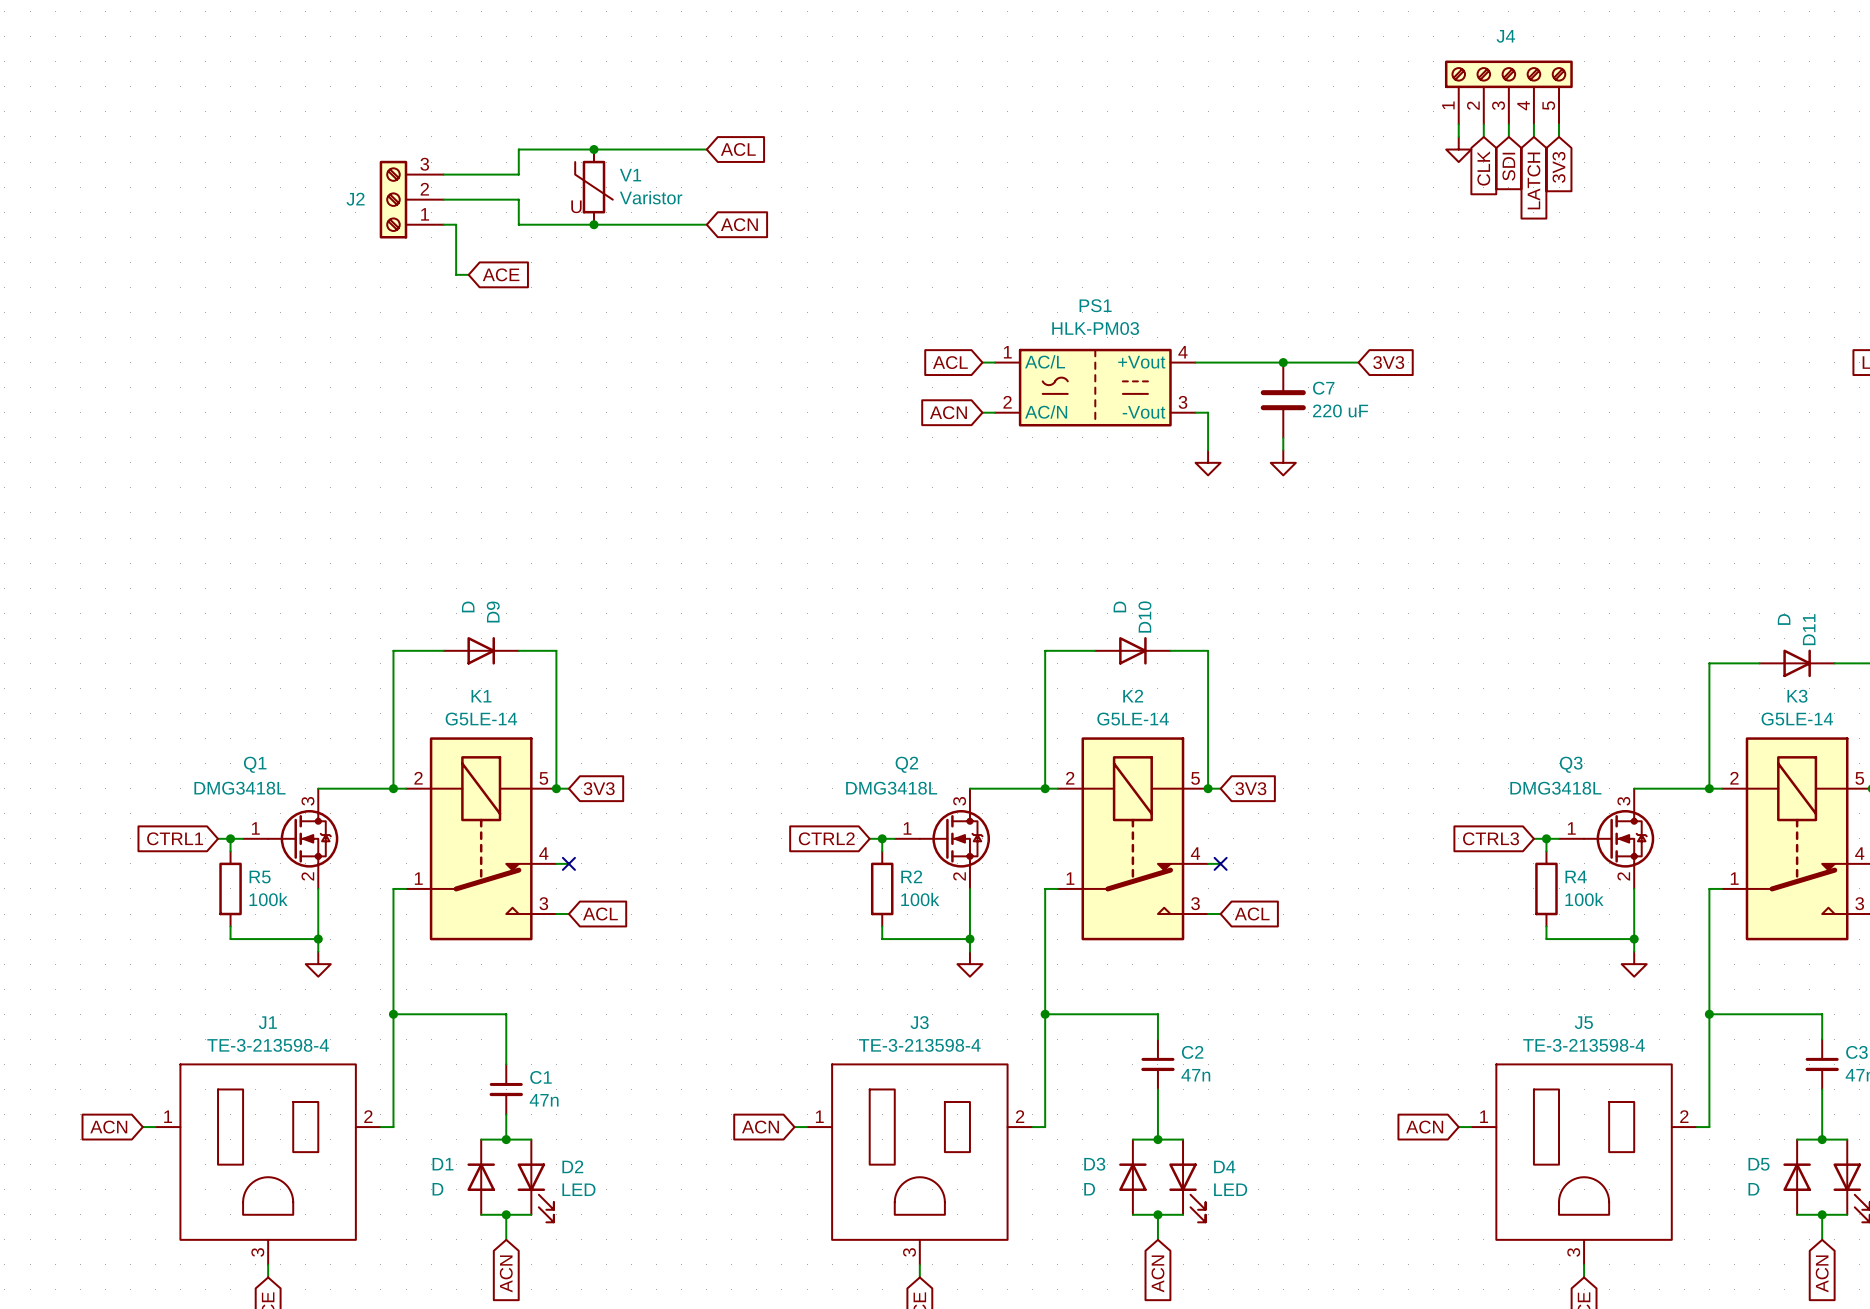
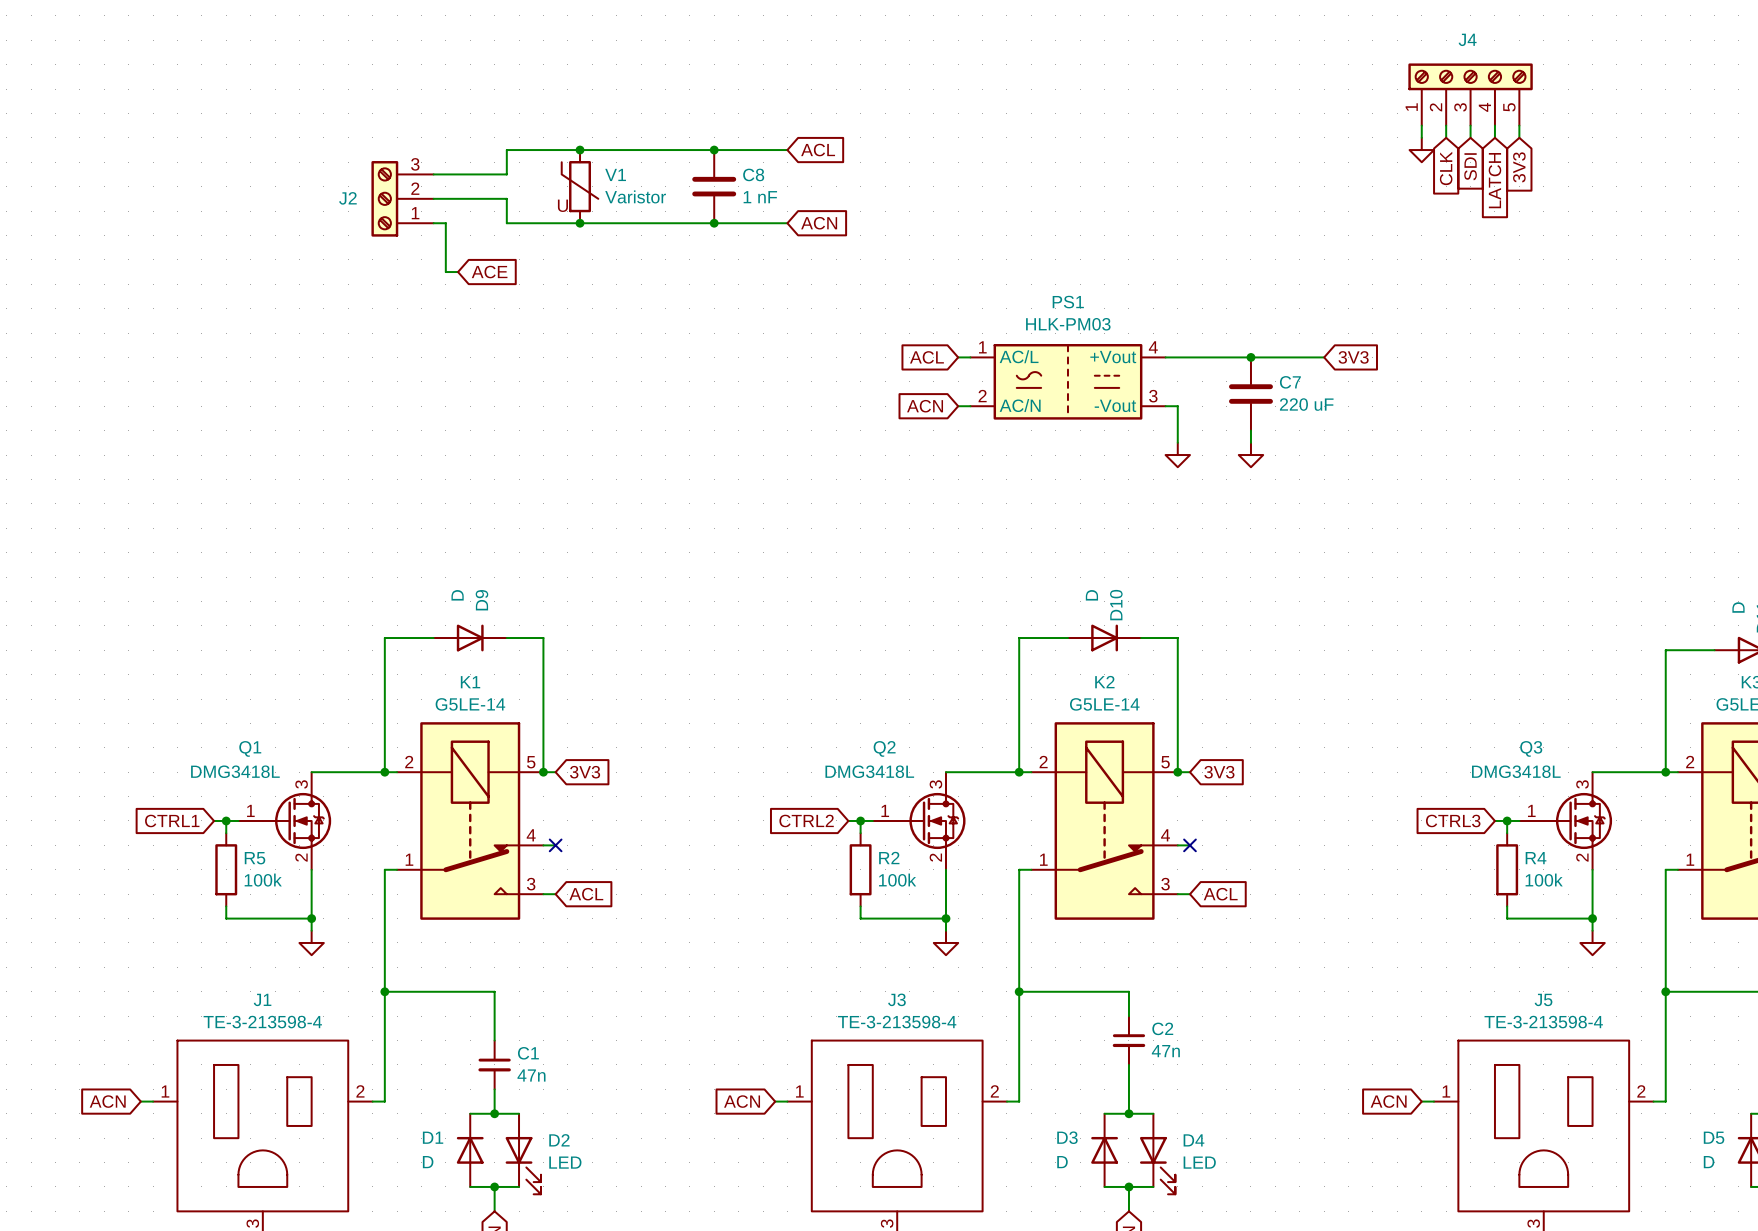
wire: none -> (689, 150) (787, 150)
junction: none -> (714, 150)
global label position: ACL (738, 149) -> ACL (818, 150)
C8: none -> 1 nF (714, 186)
wire: none -> (689, 223) (787, 223)
junction: none -> (714, 223)
global label position: ACN (739, 224) -> ACN (819, 223)

